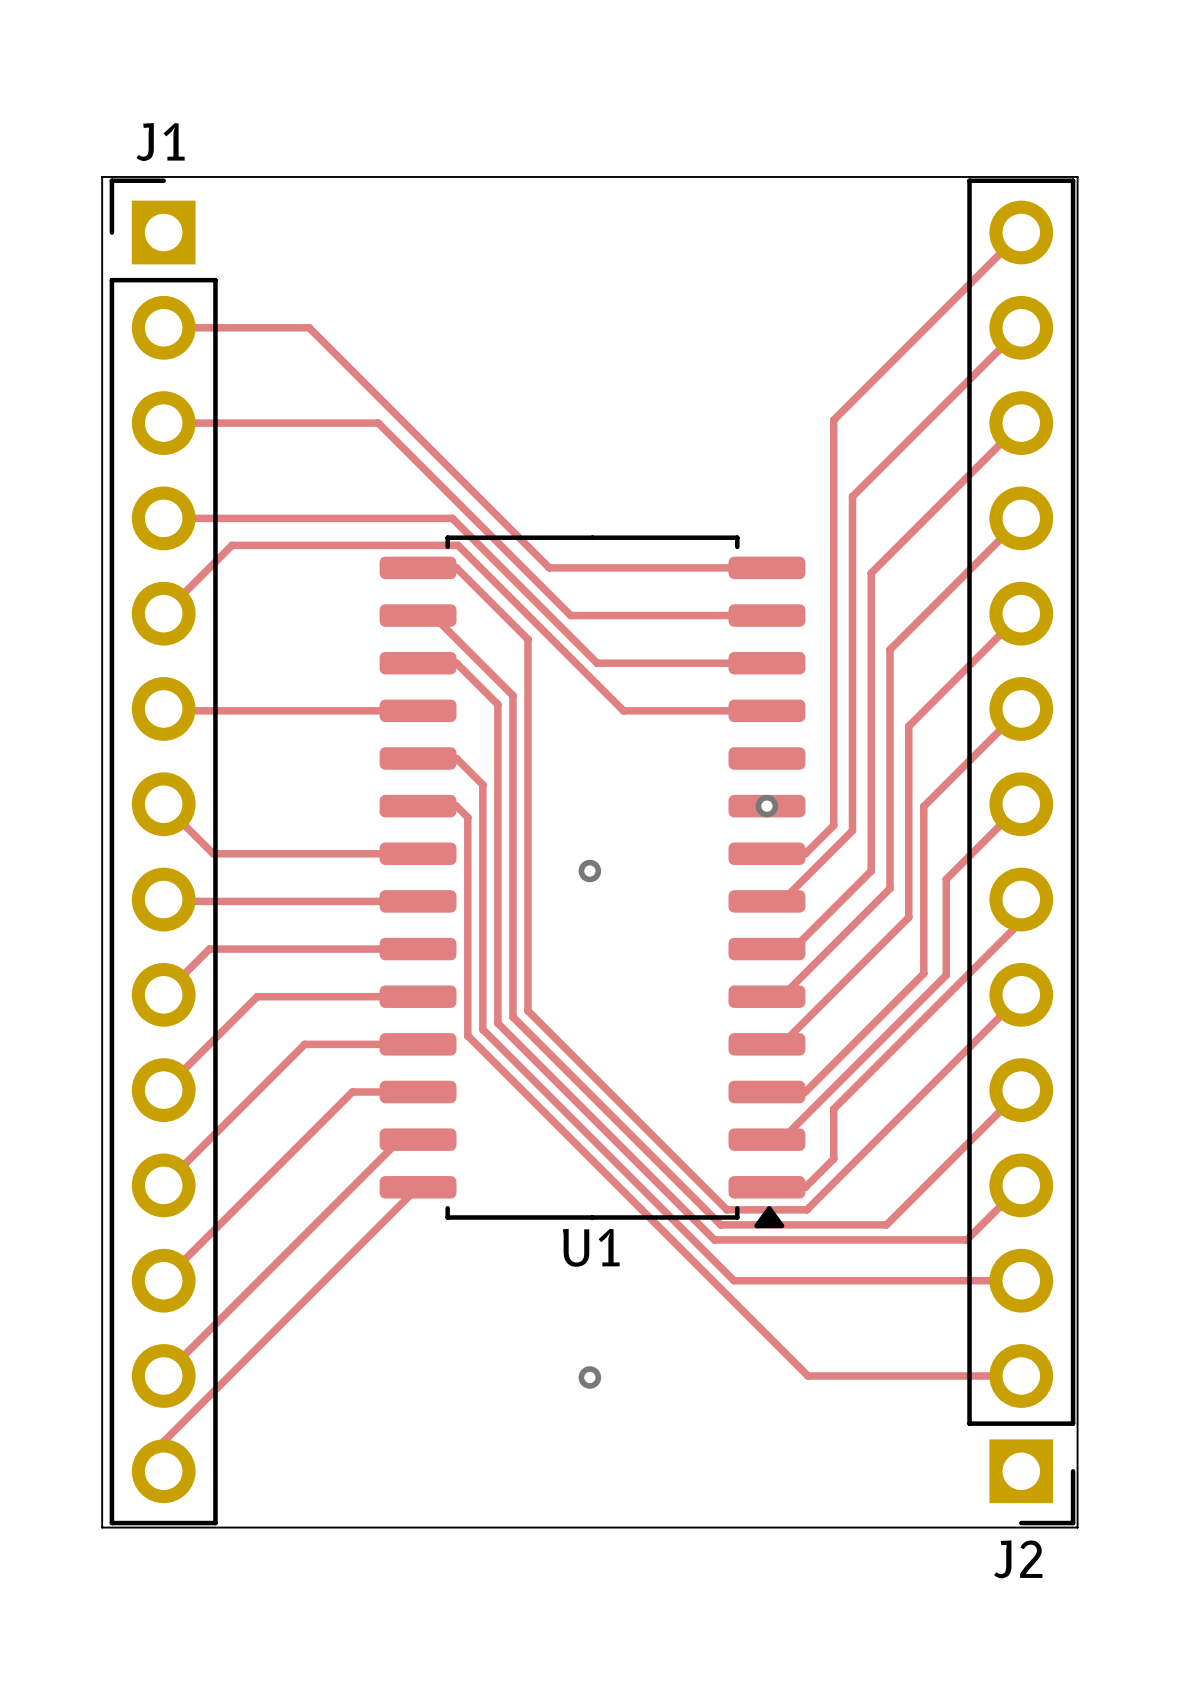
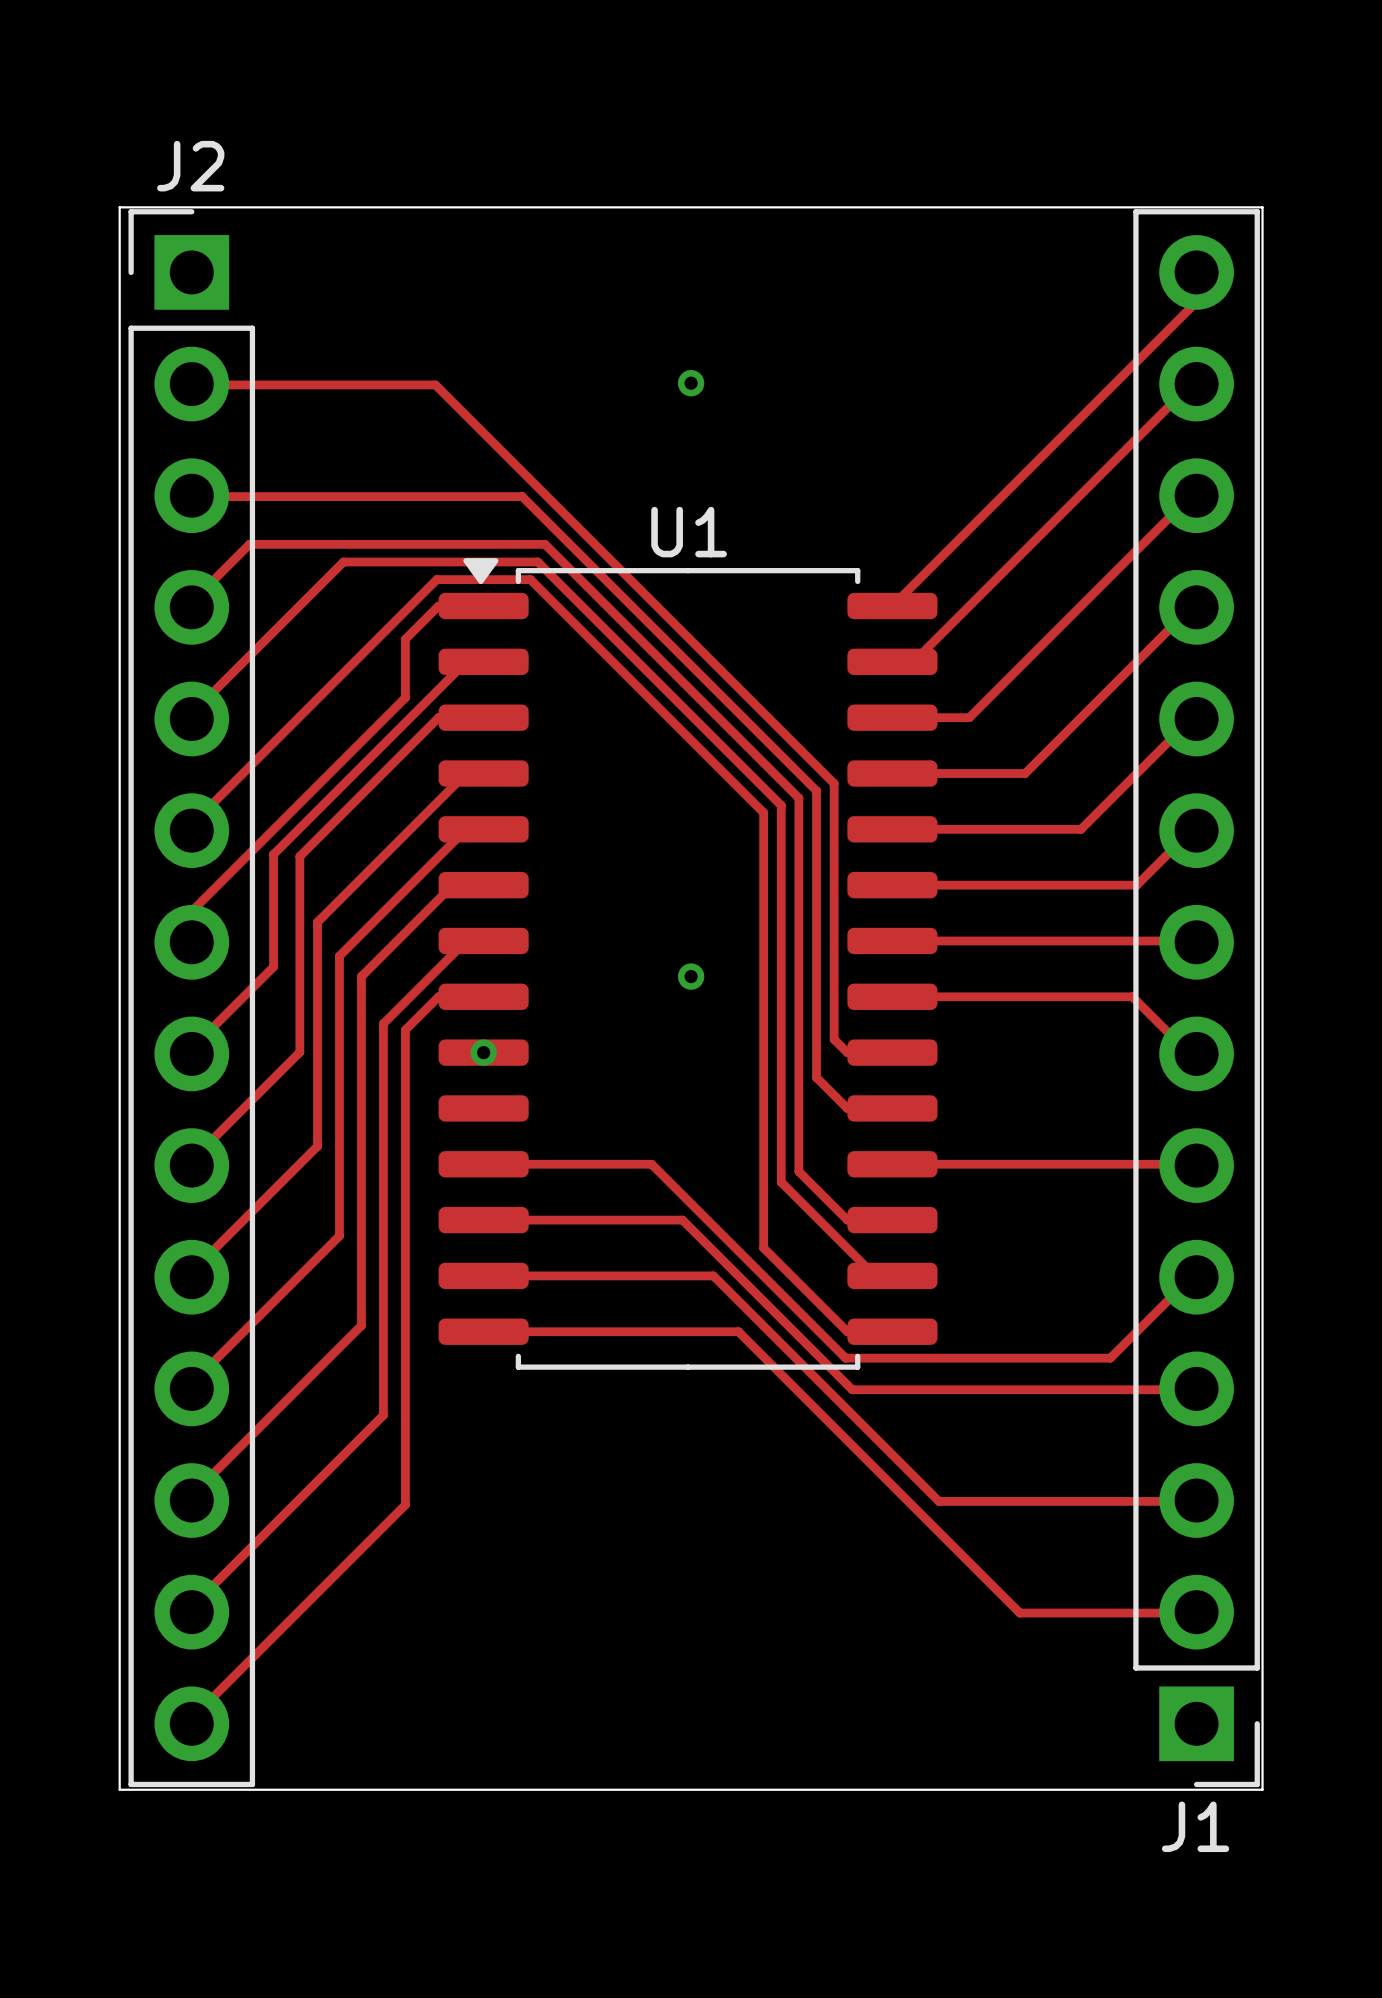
J1 name: J1 (160, 142) -> J2 (190, 166)
track: (1021, 232) (833, 420) (833, 825) (805, 853) (766, 853) -> none
track: none -> (1190, 273) (1190, 308) (892, 606)
track: (163, 327) (309, 327) (549, 567) (766, 567) -> none
via: none -> (691, 383)
track: (1021, 327) (852, 496) (852, 830) (781, 901) (766, 901) -> none
track: none -> (185, 384) (435, 384) (834, 783) (834, 1039) (847, 1052) (892, 1052)
track: none -> (1190, 384) (913, 661) (892, 661)
track: none -> (185, 496) (522, 496) (816, 790) (816, 1077) (847, 1108) (892, 1108)
track: (163, 423) (378, 423) (570, 615) (766, 615) -> none
track: none -> (1190, 496) (969, 717) (892, 717)
track: (1021, 423) (871, 573) (871, 871) (793, 949) (766, 949) -> none
track: none -> (483, 606) (438, 606) (405, 639) (405, 697) (185, 917) (185, 943)
track: (163, 518) (452, 518) (597, 663) (766, 663) -> none
track: (1021, 518) (889, 649) (889, 888) (781, 996) (766, 996) -> none
track: none -> (185, 608) (249, 544) (545, 544) (798, 798) (798, 1171) (847, 1220) (892, 1220)
track: none -> (1190, 608) (1025, 773) (892, 773)
track: none -> (483, 661) (466, 661) (273, 854) (273, 966) (185, 1054)
track: (418, 567) (456, 567) (527, 639) (527, 1010) (726, 1209) (806, 1209) (1021, 995) -> none
track: none -> (483, 717) (438, 717) (299, 856) (299, 1052) (185, 1166)
track: (163, 613) (232, 545) (458, 545) (623, 710) (766, 710) -> none
track: (1021, 613) (908, 726) (908, 917) (781, 1044) (766, 1044) -> none
track: none -> (185, 719) (343, 561) (537, 561) (781, 805) (781, 1182) (874, 1275) (892, 1275)
track: none -> (1190, 719) (1080, 829) (892, 829)
track: (418, 615) (432, 615) (512, 695) (512, 1017) (720, 1224) (886, 1224) (1021, 1090) -> none
track: none -> (483, 773) (466, 773) (317, 922) (317, 1146) (185, 1278)
track: (418, 663) (456, 663) (497, 704) (497, 1023) (714, 1239) (966, 1239) (1021, 1185) -> none
track: none -> (483, 829) (466, 829) (339, 956) (339, 1235) (185, 1389)
track: (163, 708) (165, 710) (418, 710) -> none
track: (1021, 708) (923, 806) (923, 973) (805, 1092) (766, 1092) -> none
track: none -> (185, 830) (436, 579) (530, 579) (763, 812) (763, 1248) (847, 1331) (892, 1331)
track: none -> (1190, 831) (1136, 885) (892, 885)
track: none -> (483, 885) (452, 885) (361, 976) (361, 1325) (185, 1501)
track: (418, 758) (456, 758) (482, 784) (482, 1029) (733, 1280) (1021, 1280) -> none
track: none -> (483, 940) (466, 940) (383, 1023) (383, 1415) (185, 1613)
track: none -> (892, 940) (1188, 940) (1190, 943)
track: (163, 804) (213, 853) (418, 853) -> none
track: (1021, 804) (946, 879) (946, 975) (781, 1139) (766, 1139) -> none
track: (418, 806) (456, 806) (467, 817) (467, 1035) (808, 1375) (1021, 1375) -> none
via: (766, 806) -> none
track: none -> (483, 996) (438, 996) (405, 1029) (405, 1504) (185, 1724)
track: none -> (892, 996) (1132, 996) (1190, 1054)
via position: (589, 871) -> (691, 976)
U1 rotation: 0° (592, 881) -> 180° (688, 963)
via: none -> (483, 1052)
track: (163, 899) (165, 901) (418, 901) -> none
track: (1021, 899) (1021, 921) (833, 1109) (833, 1158) (805, 1187) (766, 1187) -> none
track: (418, 949) (209, 949) (163, 994) -> none
track: none -> (483, 1164) (651, 1164) (845, 1358) (1110, 1358) (1190, 1278)
track: none -> (892, 1164) (1188, 1164) (1190, 1166)
track: (418, 996) (257, 996) (163, 1090) -> none
track: none -> (483, 1220) (682, 1220) (852, 1389) (1190, 1389)
track: (418, 1044) (304, 1044) (163, 1185) -> none
track: none -> (483, 1275) (713, 1275) (938, 1501) (1190, 1501)
track: (418, 1092) (352, 1092) (163, 1280) -> none
track: none -> (483, 1331) (738, 1331) (1019, 1613) (1190, 1613)
track: (418, 1139) (400, 1139) (163, 1375) -> none
track: (418, 1187) (163, 1441) (163, 1471) -> none
via: (589, 1377) -> none
J2 name: J2 (1018, 1559) -> J1 (1195, 1826)

